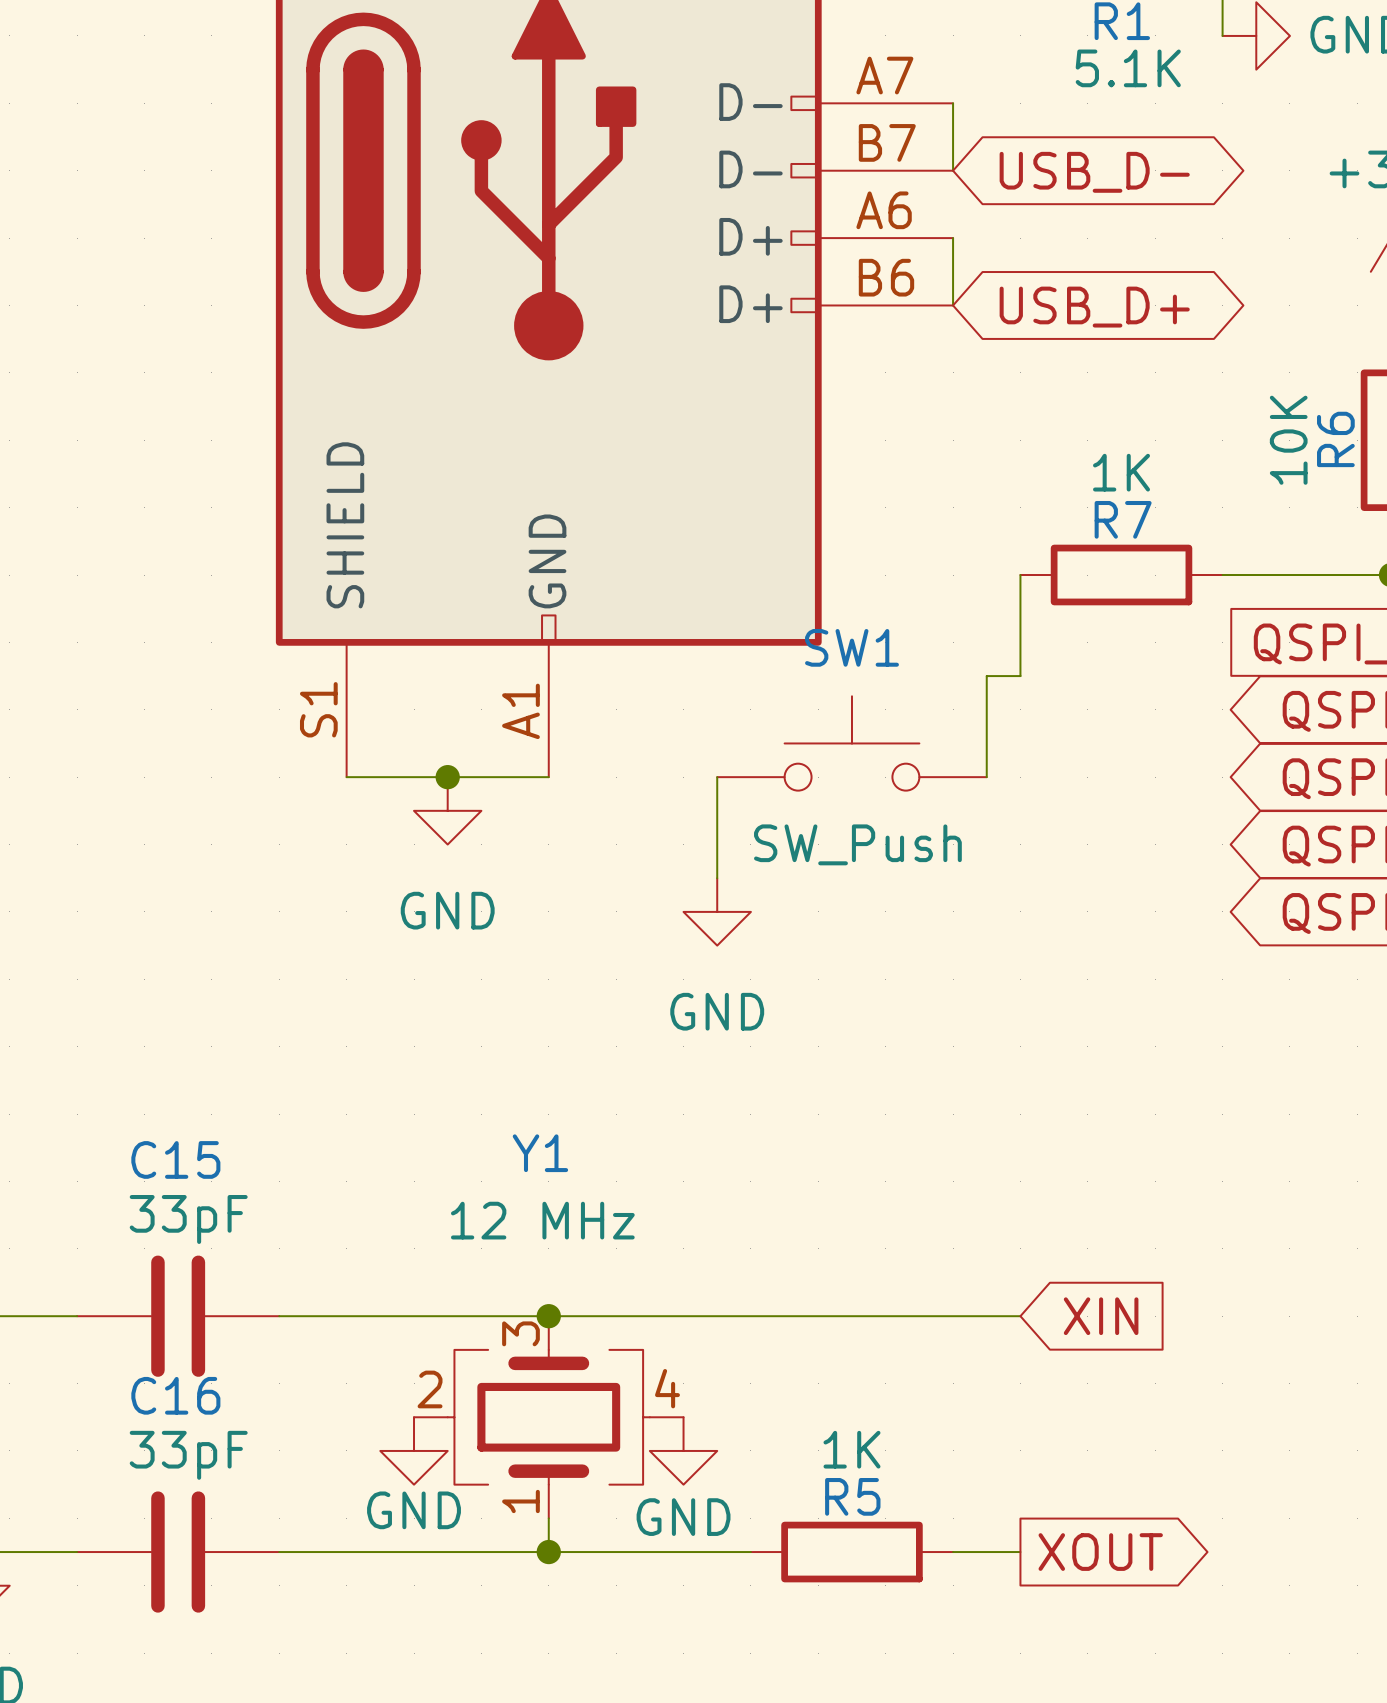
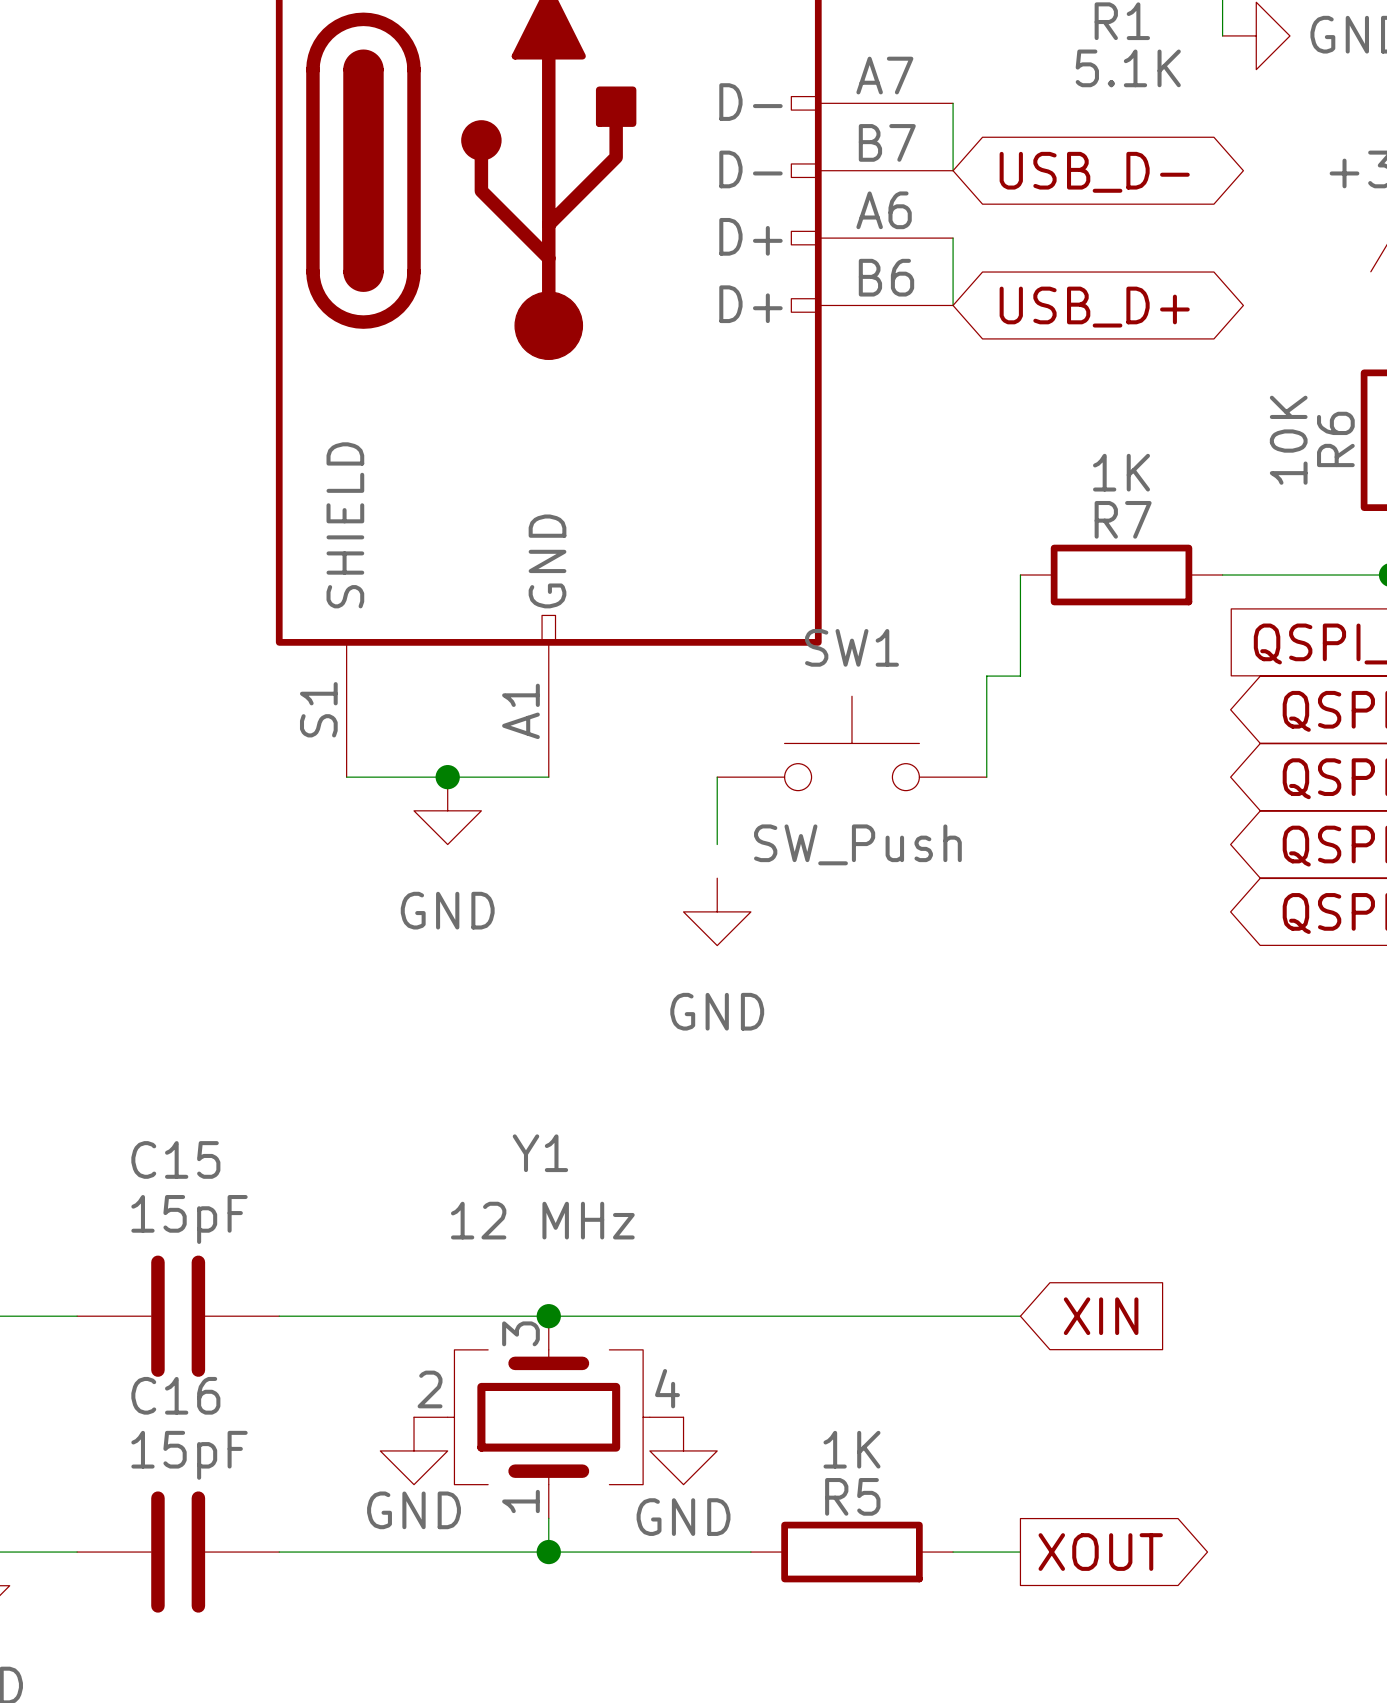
wire: (717, 844) (717, 878) -> none
C15 value: 33pF (188, 1219) -> 15pF (189, 1219)
C16 value: 33pF (188, 1455) -> 15pF (189, 1455)

